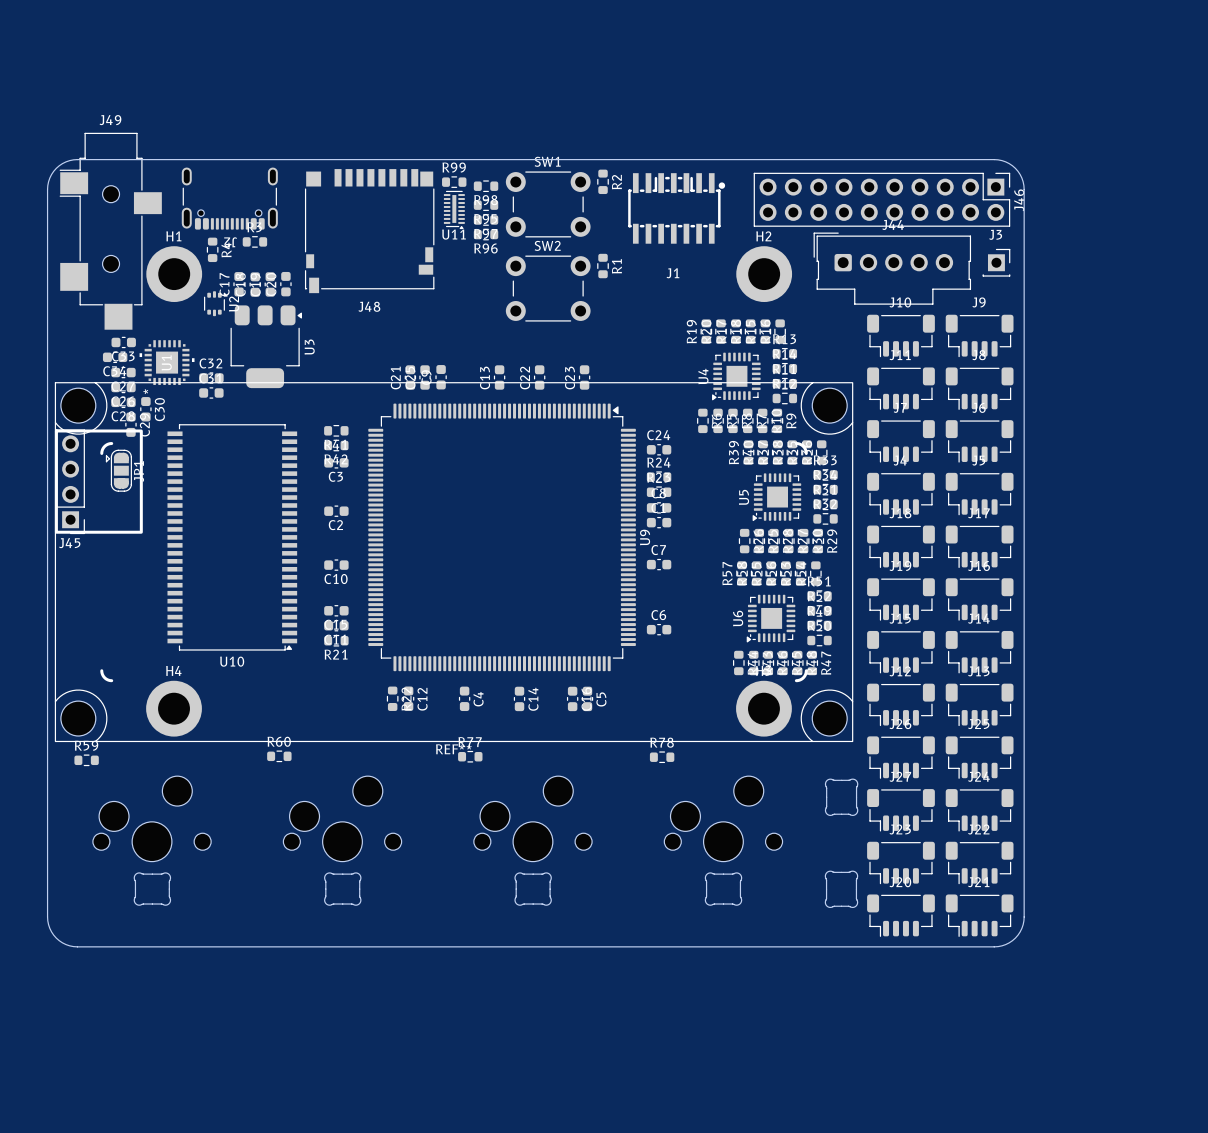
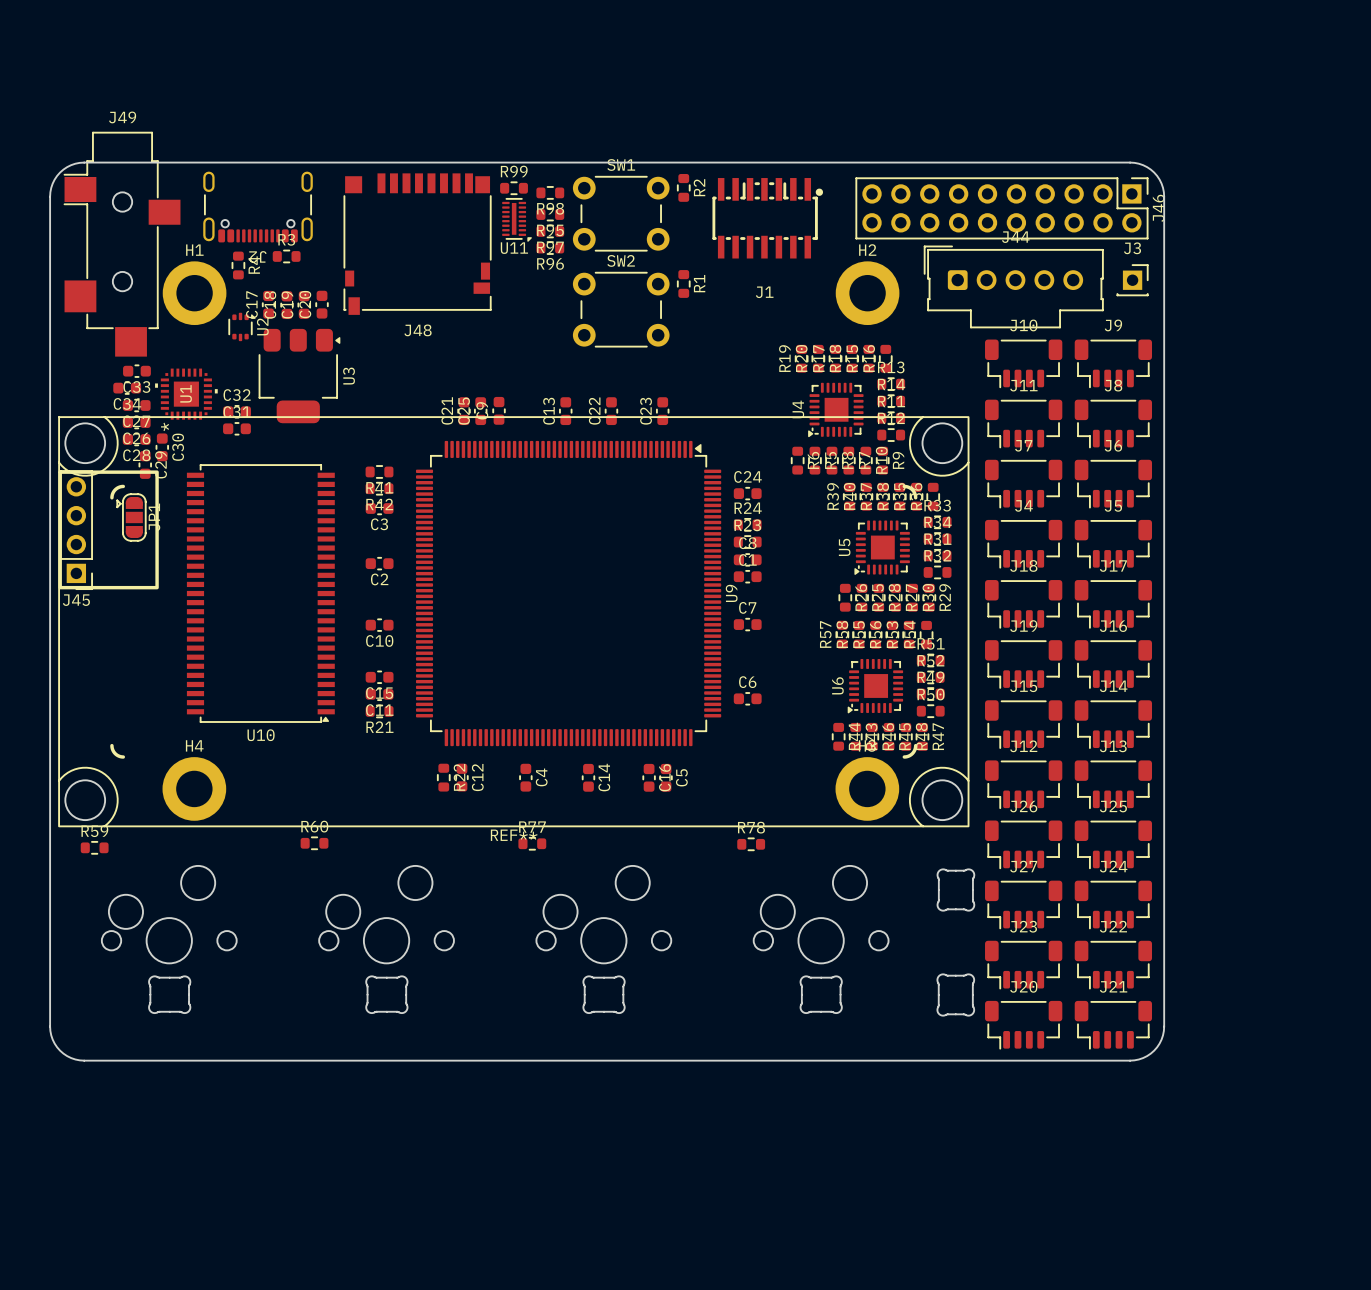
U11 footprint: [443, 190, 465, 230] -> [502, 198, 532, 242]

